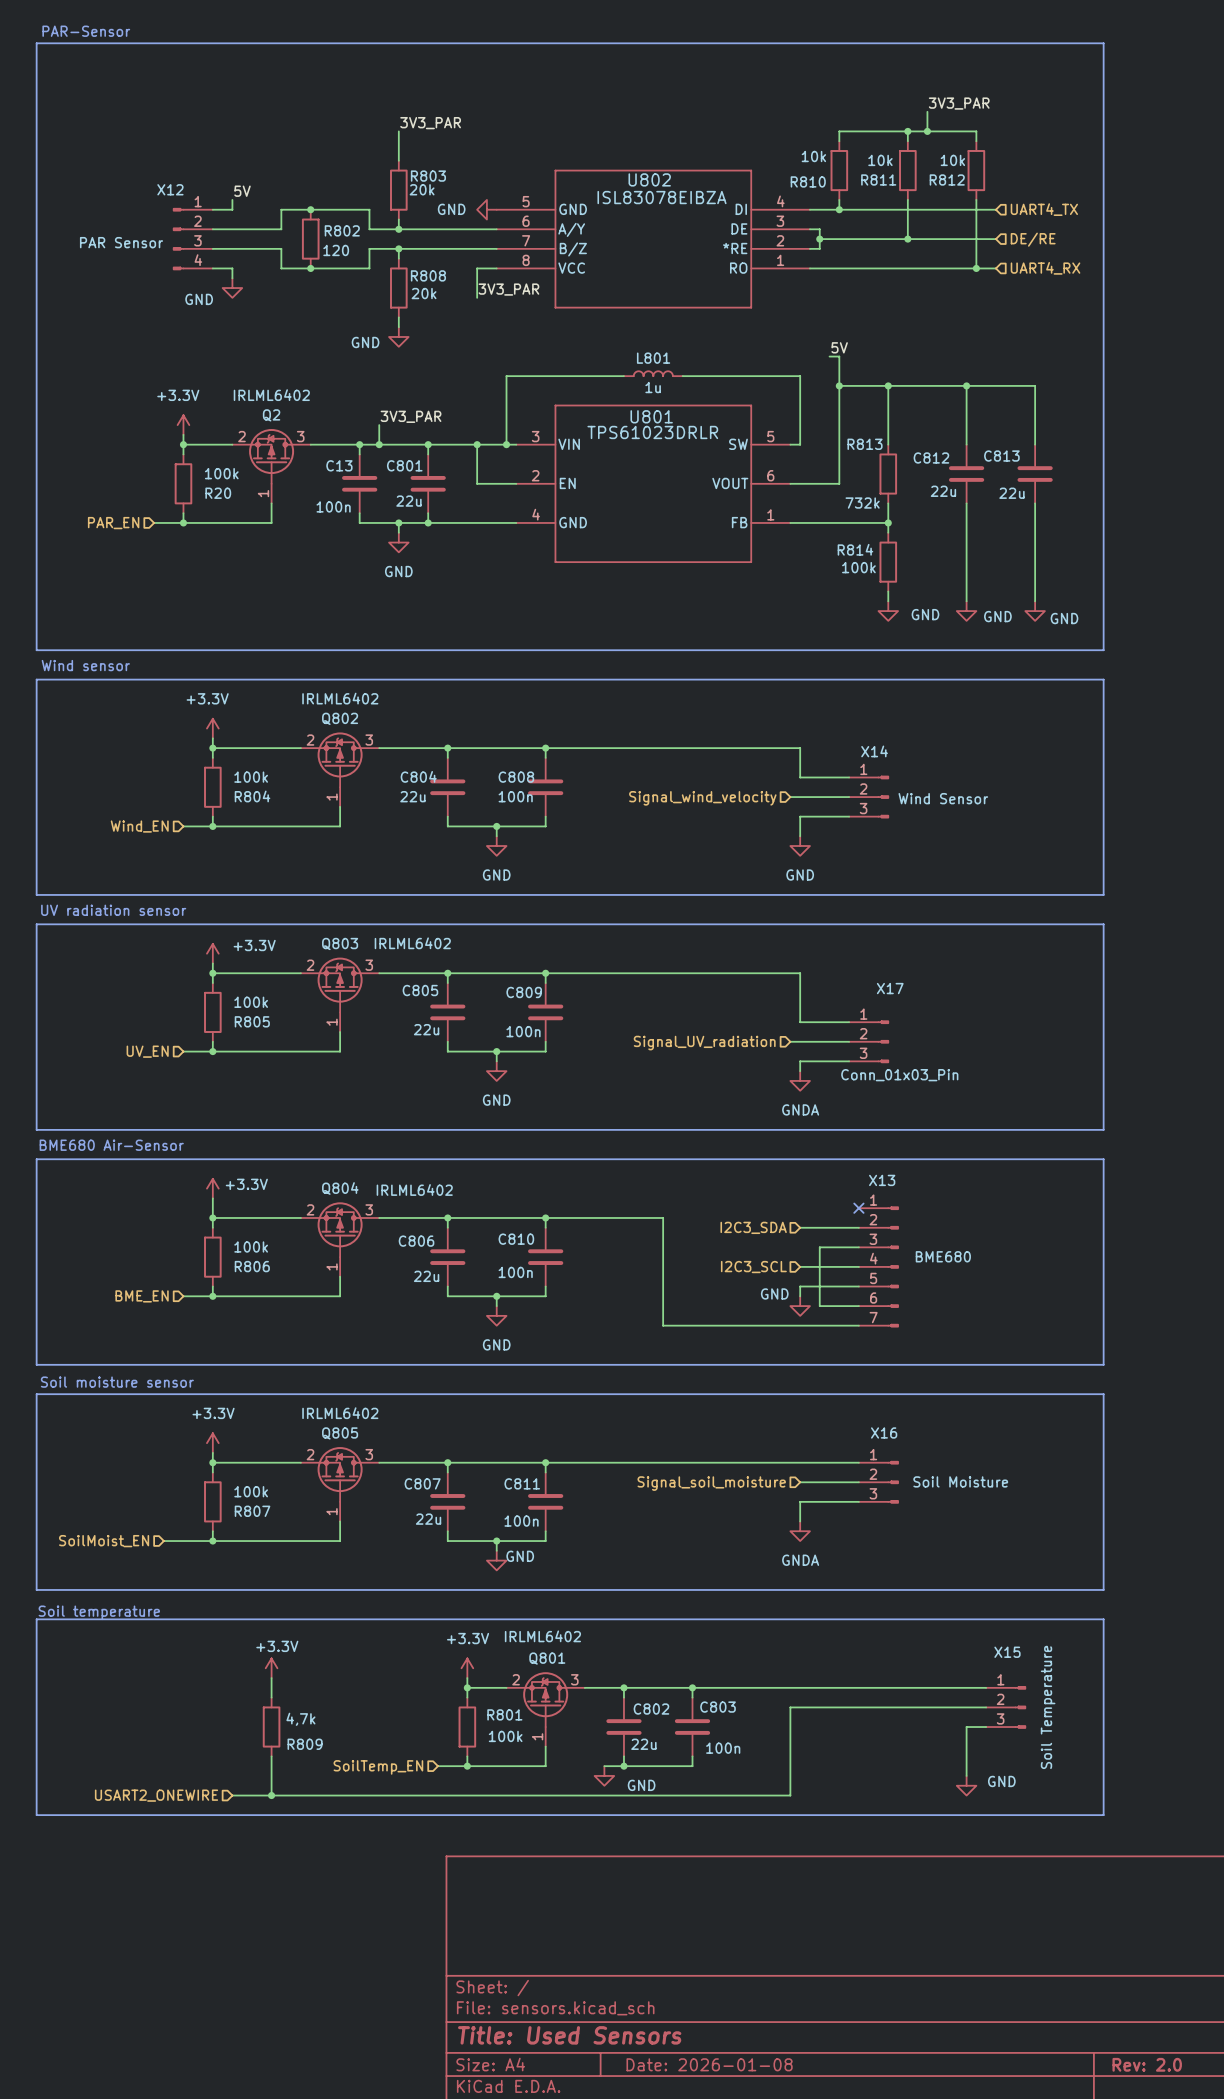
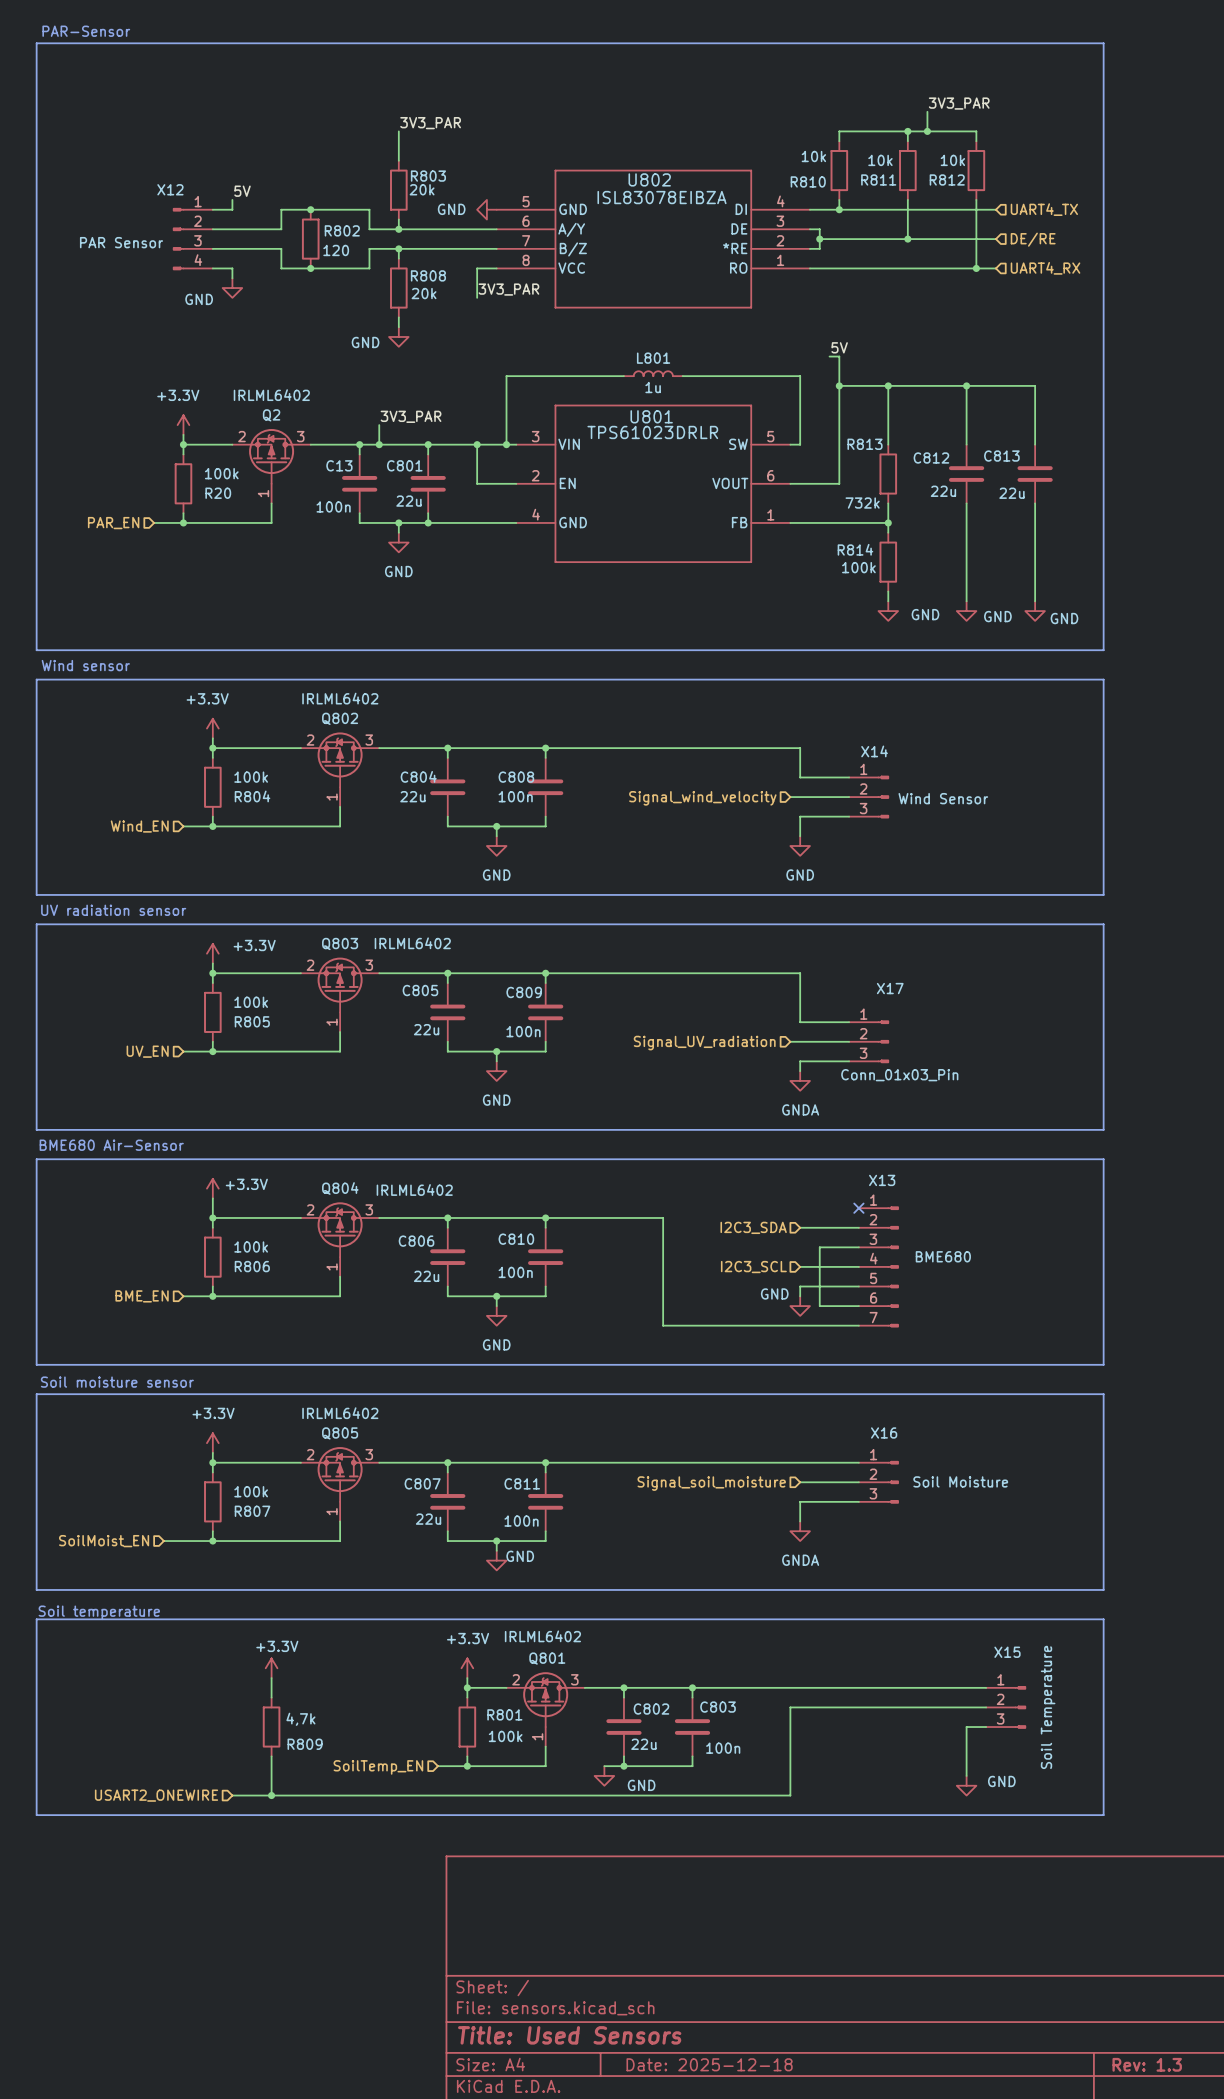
title block: Date: 2026-01-08 (709, 2064) -> Date: 2025-12-18 (709, 2064)
title block: Rev: 2.0 (1147, 2064) -> Rev: 1.3 (1147, 2064)

